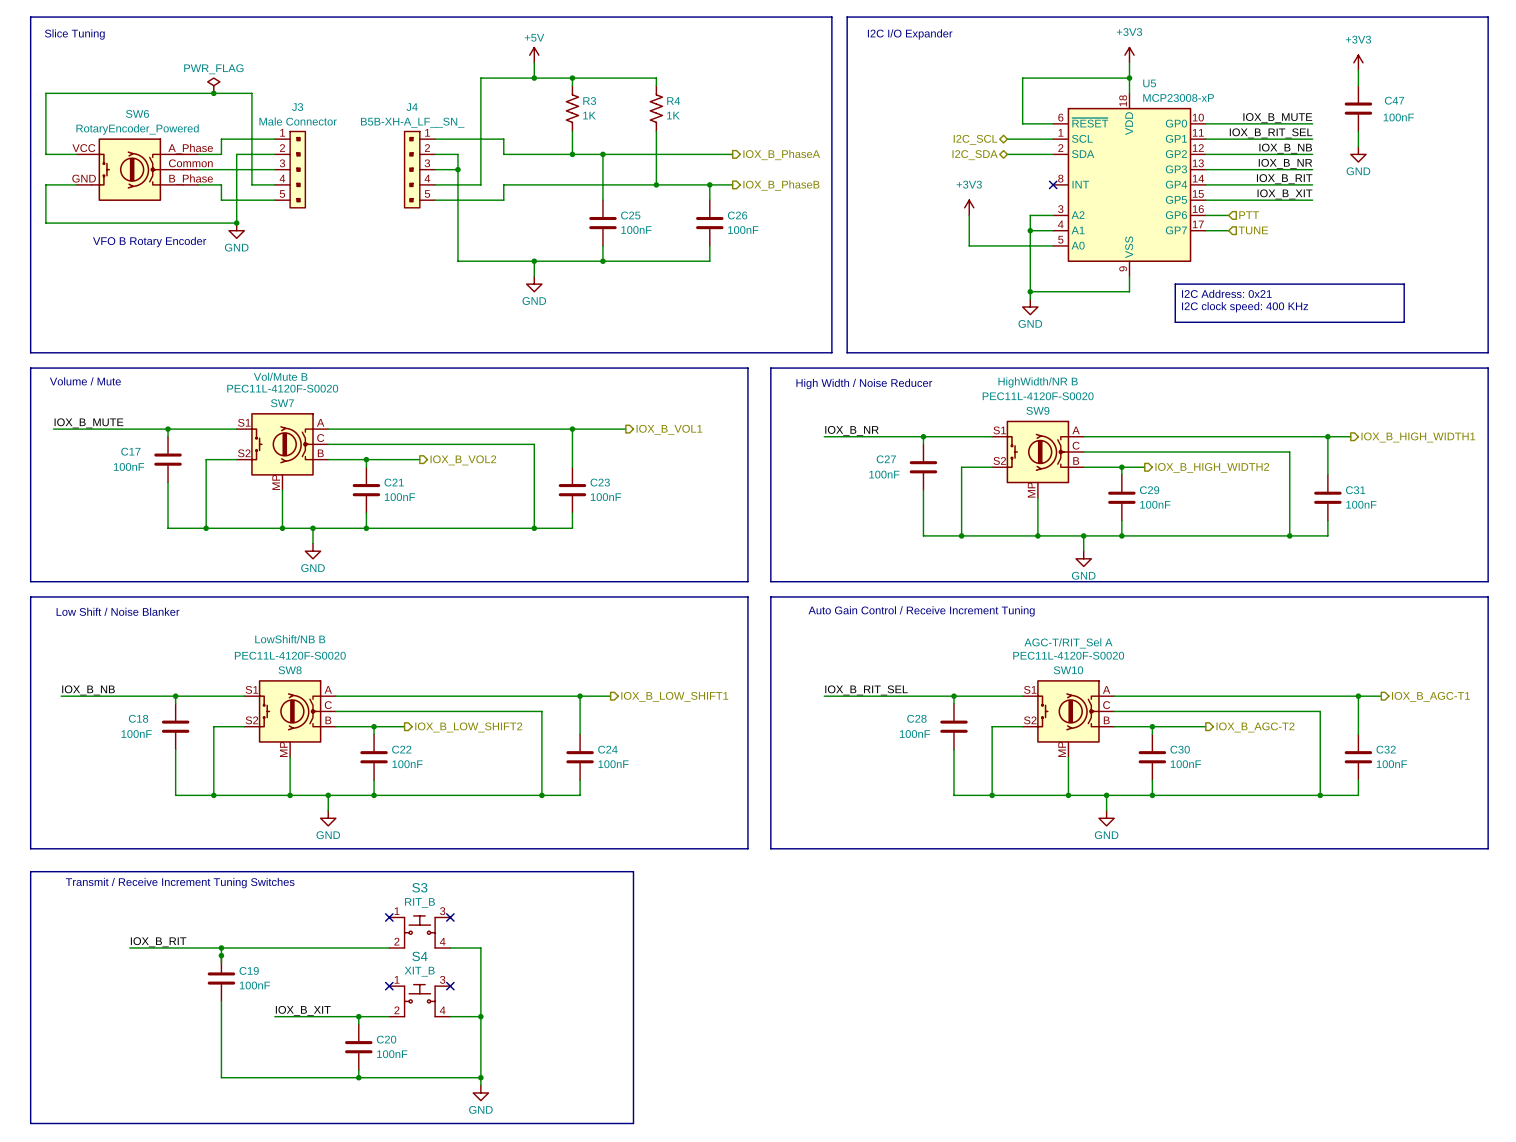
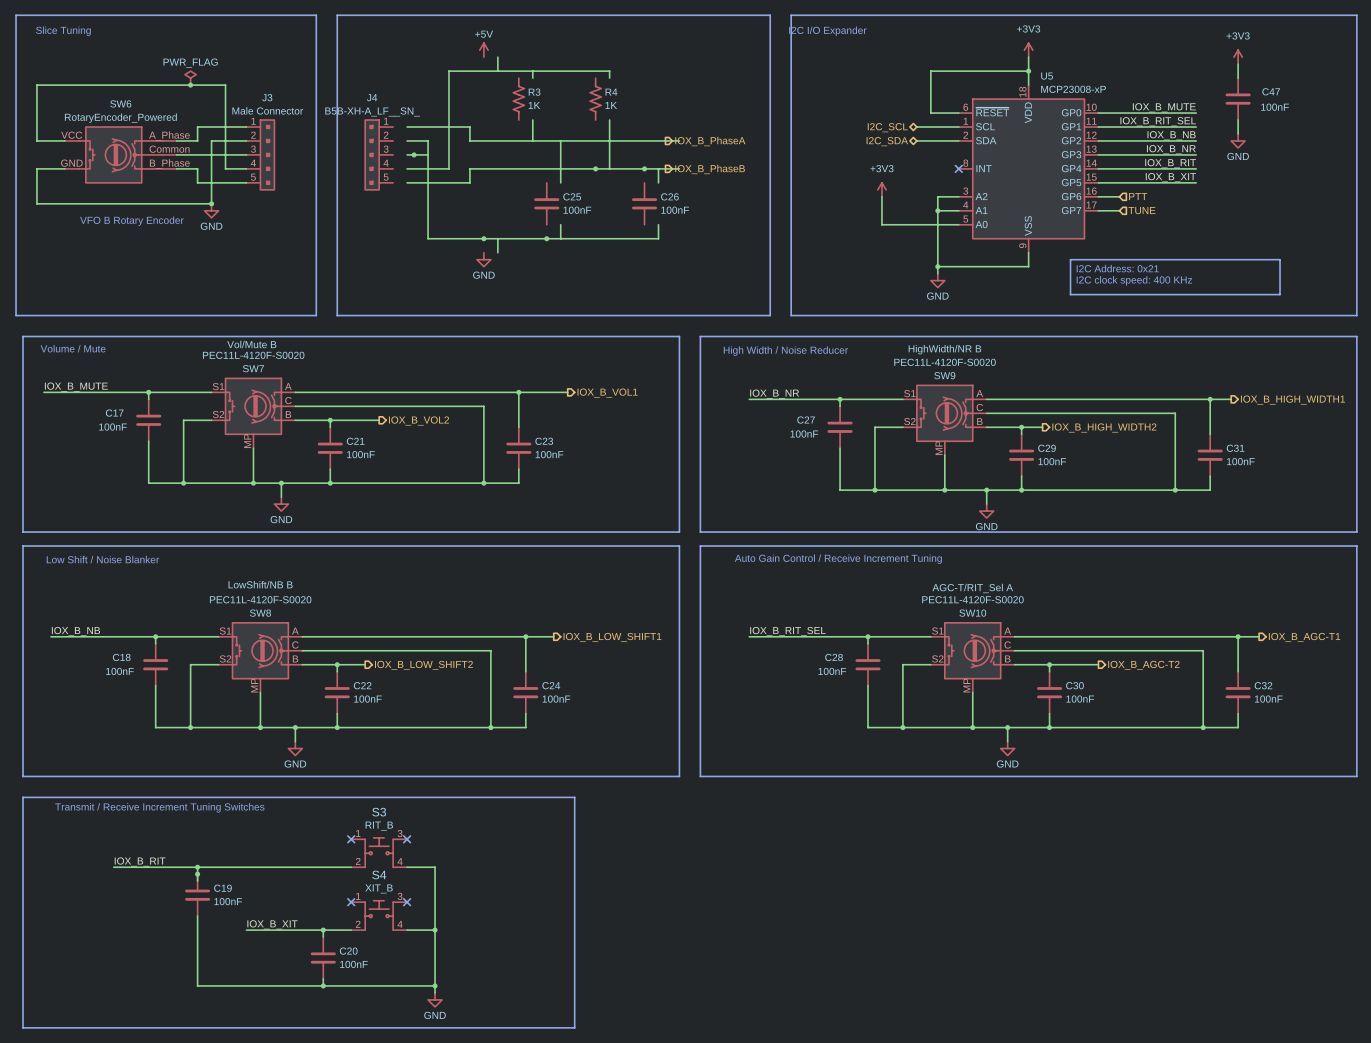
line: (30, 17) (30, 352) (831, 352) (831, 17) -> none
line: (351, 17) (374, 17) -> (316, 15) (316, 315) (16, 315) (16, 15) (23, 15)
line: none -> (337, 15) (337, 315) (770, 315)
line: (847, 17) (870, 17) -> (770, 15) (756, 15)
wire: (534, 62) (534, 78) -> (497, 57) (497, 71)
wire: (496, 78) (480, 78) (480, 184) -> (448, 71) (448, 168) (435, 168)
junction: (534, 78) -> none
wire: (572, 78) (572, 85) -> (532, 71) (532, 78)
junction: (572, 78) -> none
wire: (656, 78) (656, 85) -> (595, 71) (609, 71) (609, 78)
wire: (572, 131) (572, 154) -> (532, 120) (532, 140)
wire: (656, 131) (656, 184) -> (609, 120) (609, 168)
wire: (435, 139) (450, 139) -> none
wire: (503, 139) (503, 154) (519, 154) -> (455, 127) (469, 127) (469, 140)
wire: (435, 154) (450, 154) -> none
wire: (457, 154) (457, 261) (473, 261) -> (414, 140) (428, 140) (428, 238)
junction: (572, 154) -> none
wire: (602, 154) (602, 200) -> (560, 140) (560, 182)
junction: (602, 154) -> none
wire: none -> (665, 140) (679, 140)
wire: (435, 169) (450, 169) -> (414, 154) (428, 154)
wire: (435, 184) (450, 184) -> none
wire: (519, 184) (503, 184) (503, 200) -> (469, 168) (469, 182) (455, 182)
wire: (709, 184) (709, 200) -> (658, 168) (658, 182)
wire: none -> (665, 168) (679, 168)
wire: (435, 200) (450, 200) -> none
wire: (602, 245) (602, 261) -> (560, 224) (560, 238)
wire: (709, 245) (709, 261) -> (658, 224) (658, 238) (644, 238)
wire: (534, 261) (534, 276) -> (497, 238) (497, 252)
line: (847, 345) (847, 352) (1488, 352) (1488, 345) -> (791, 15) (791, 315) (1356, 315)

